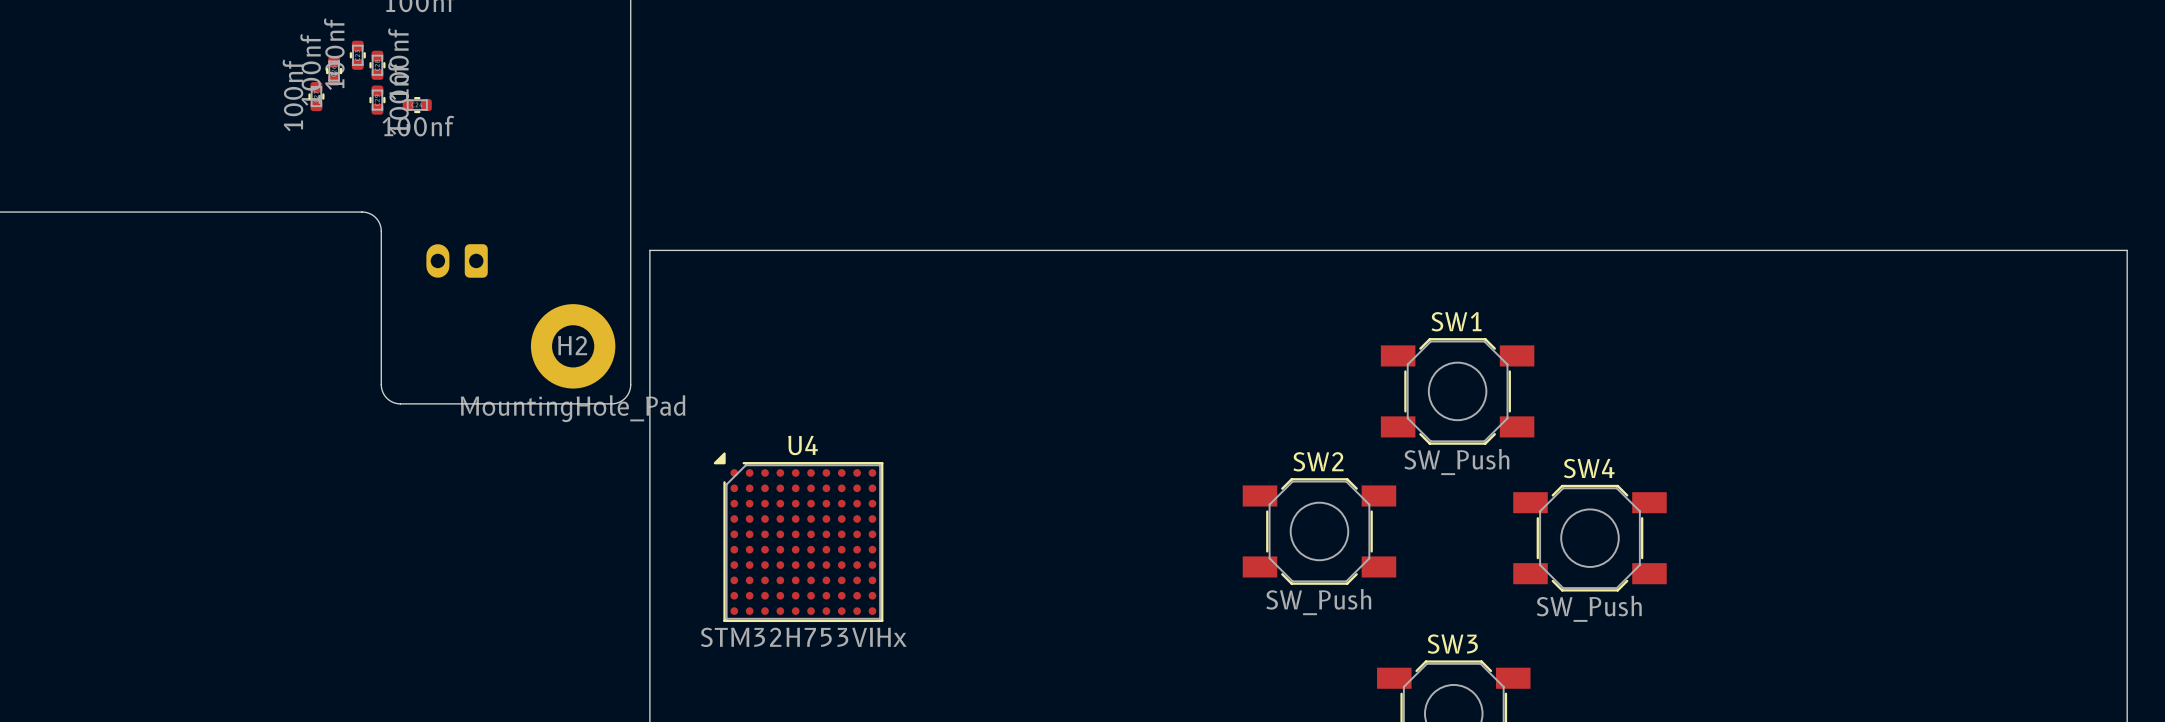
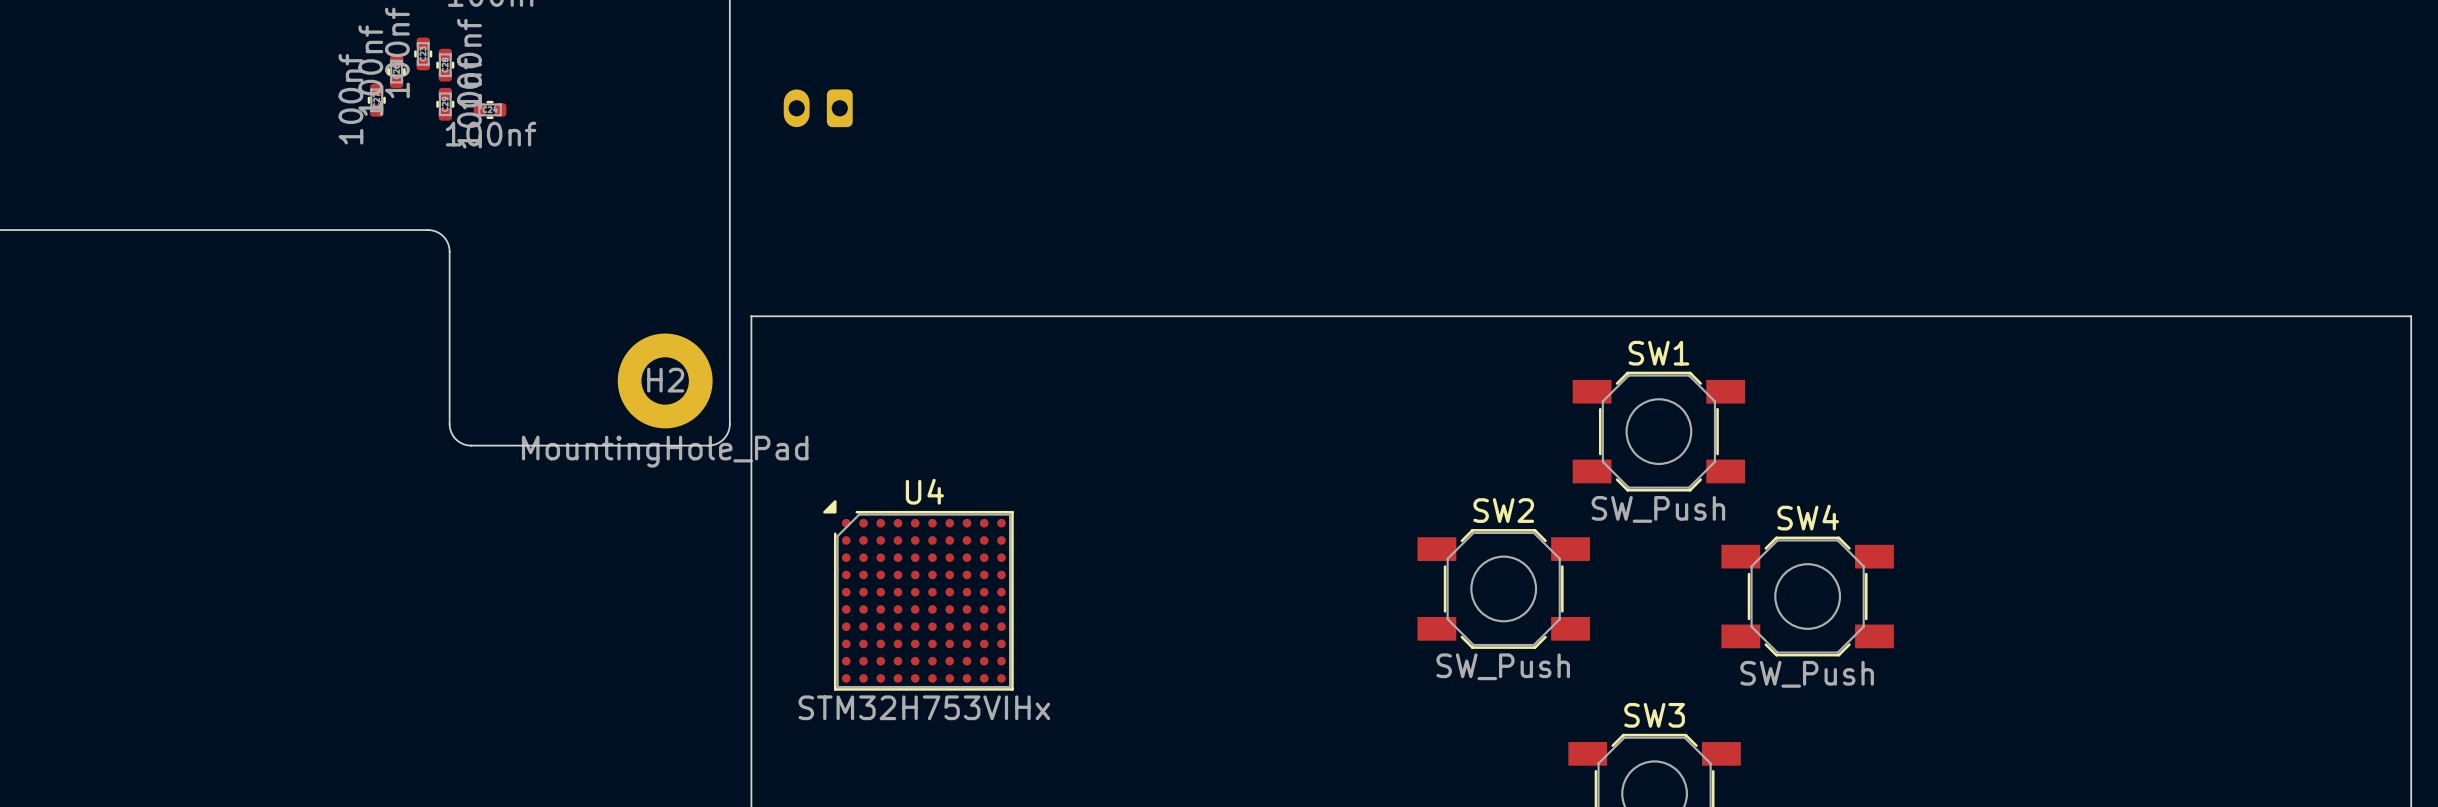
part position: (457, 260) -> (818, 108)
board edge: (649, 288) (649, 250) (2127, 250) (2127, 288) -> (751, 316) (2411, 316)

